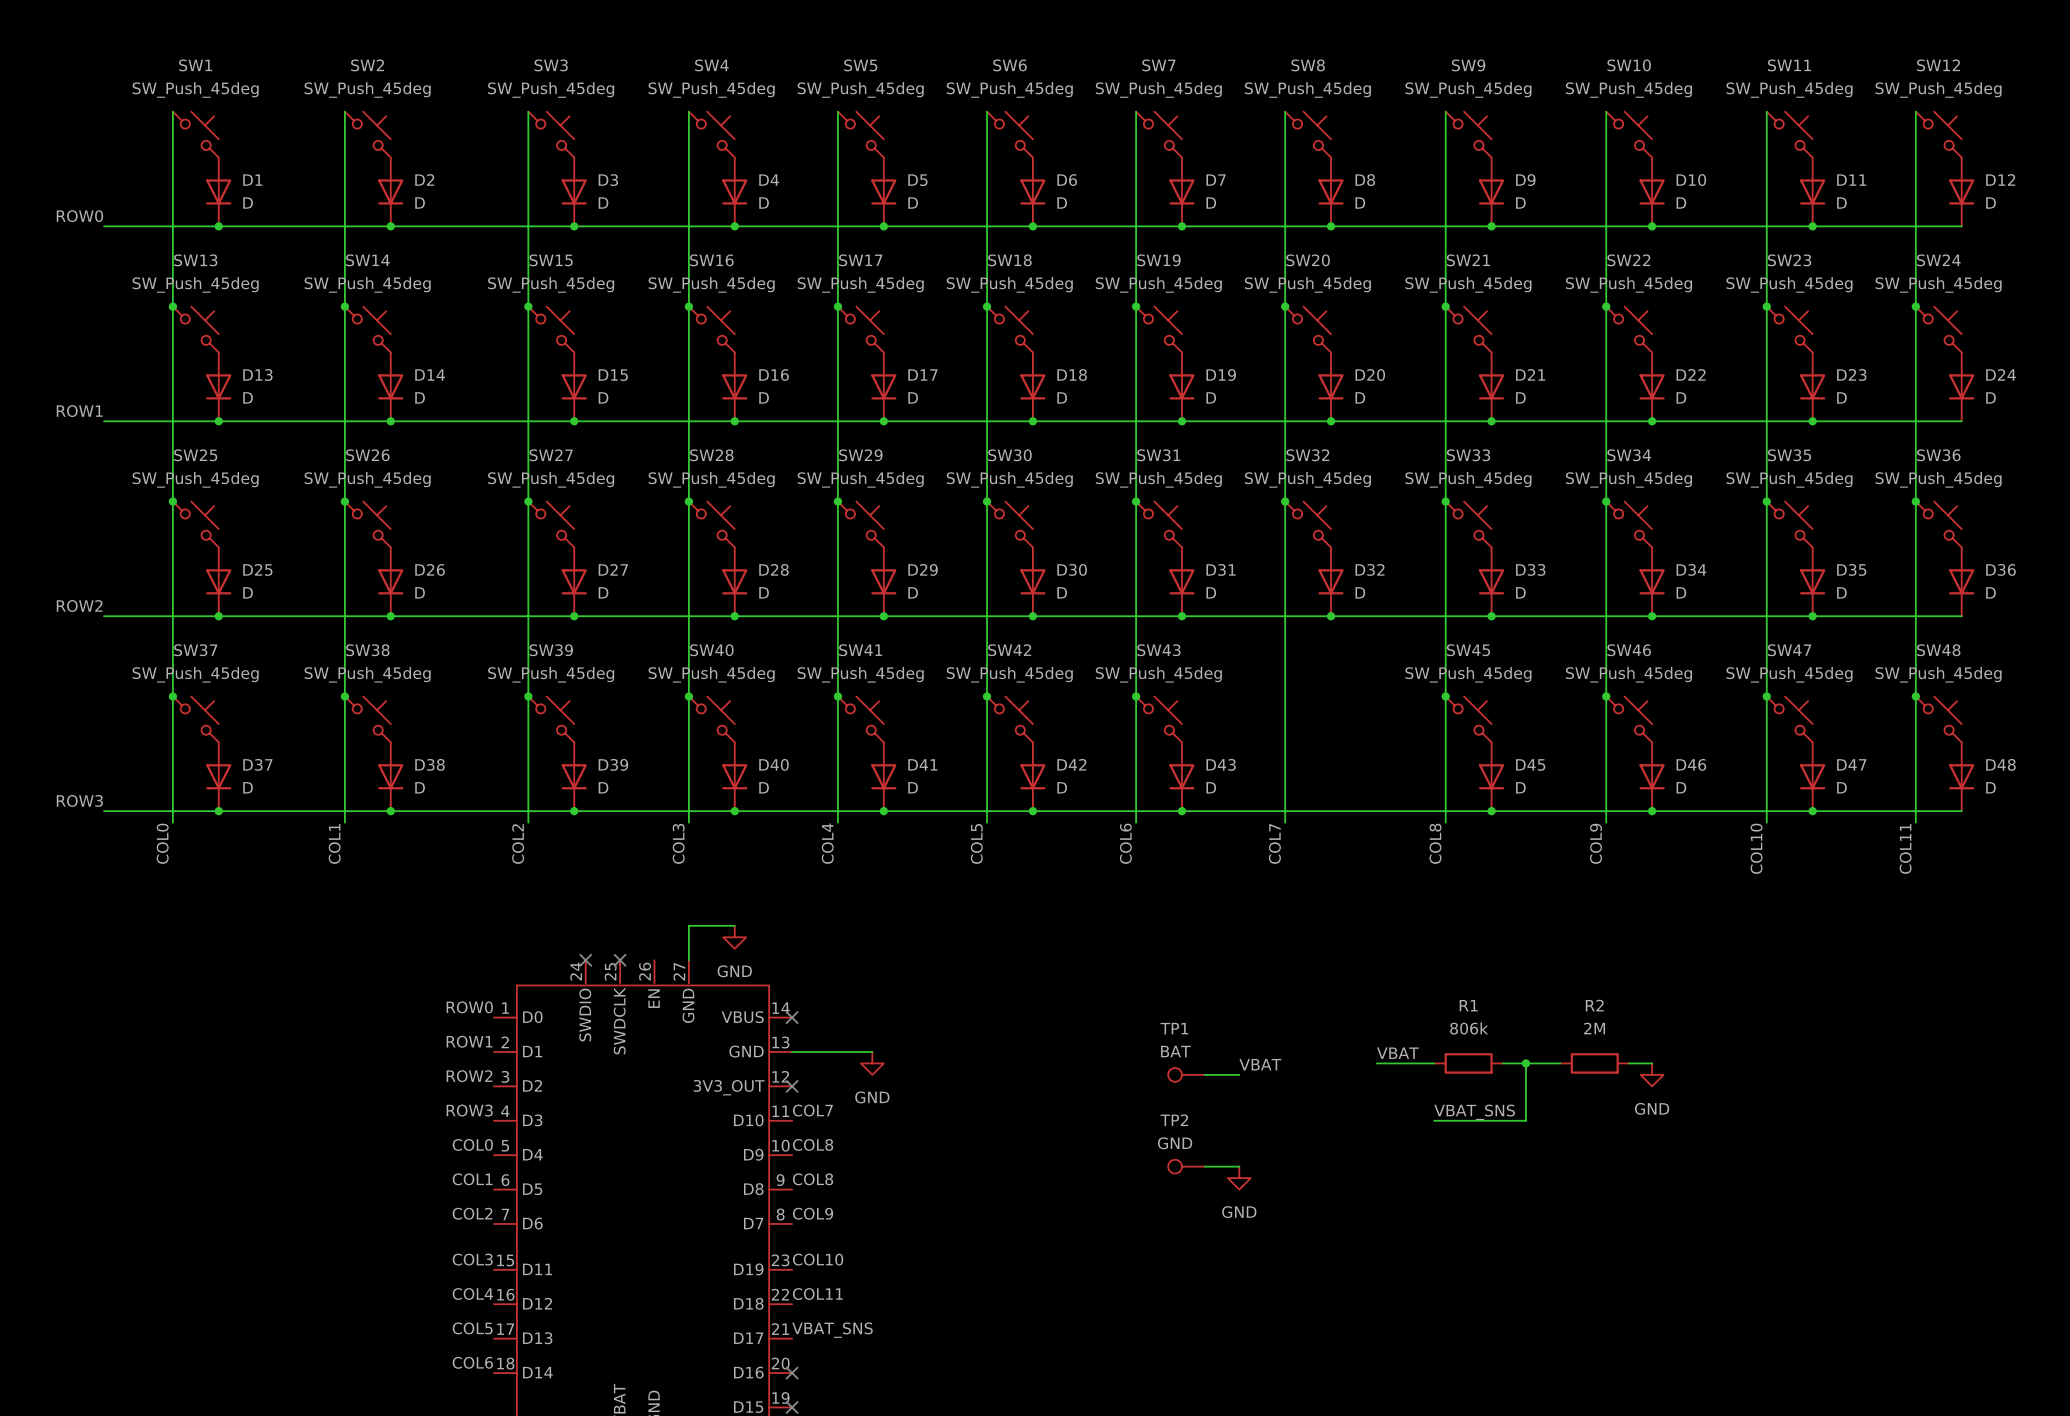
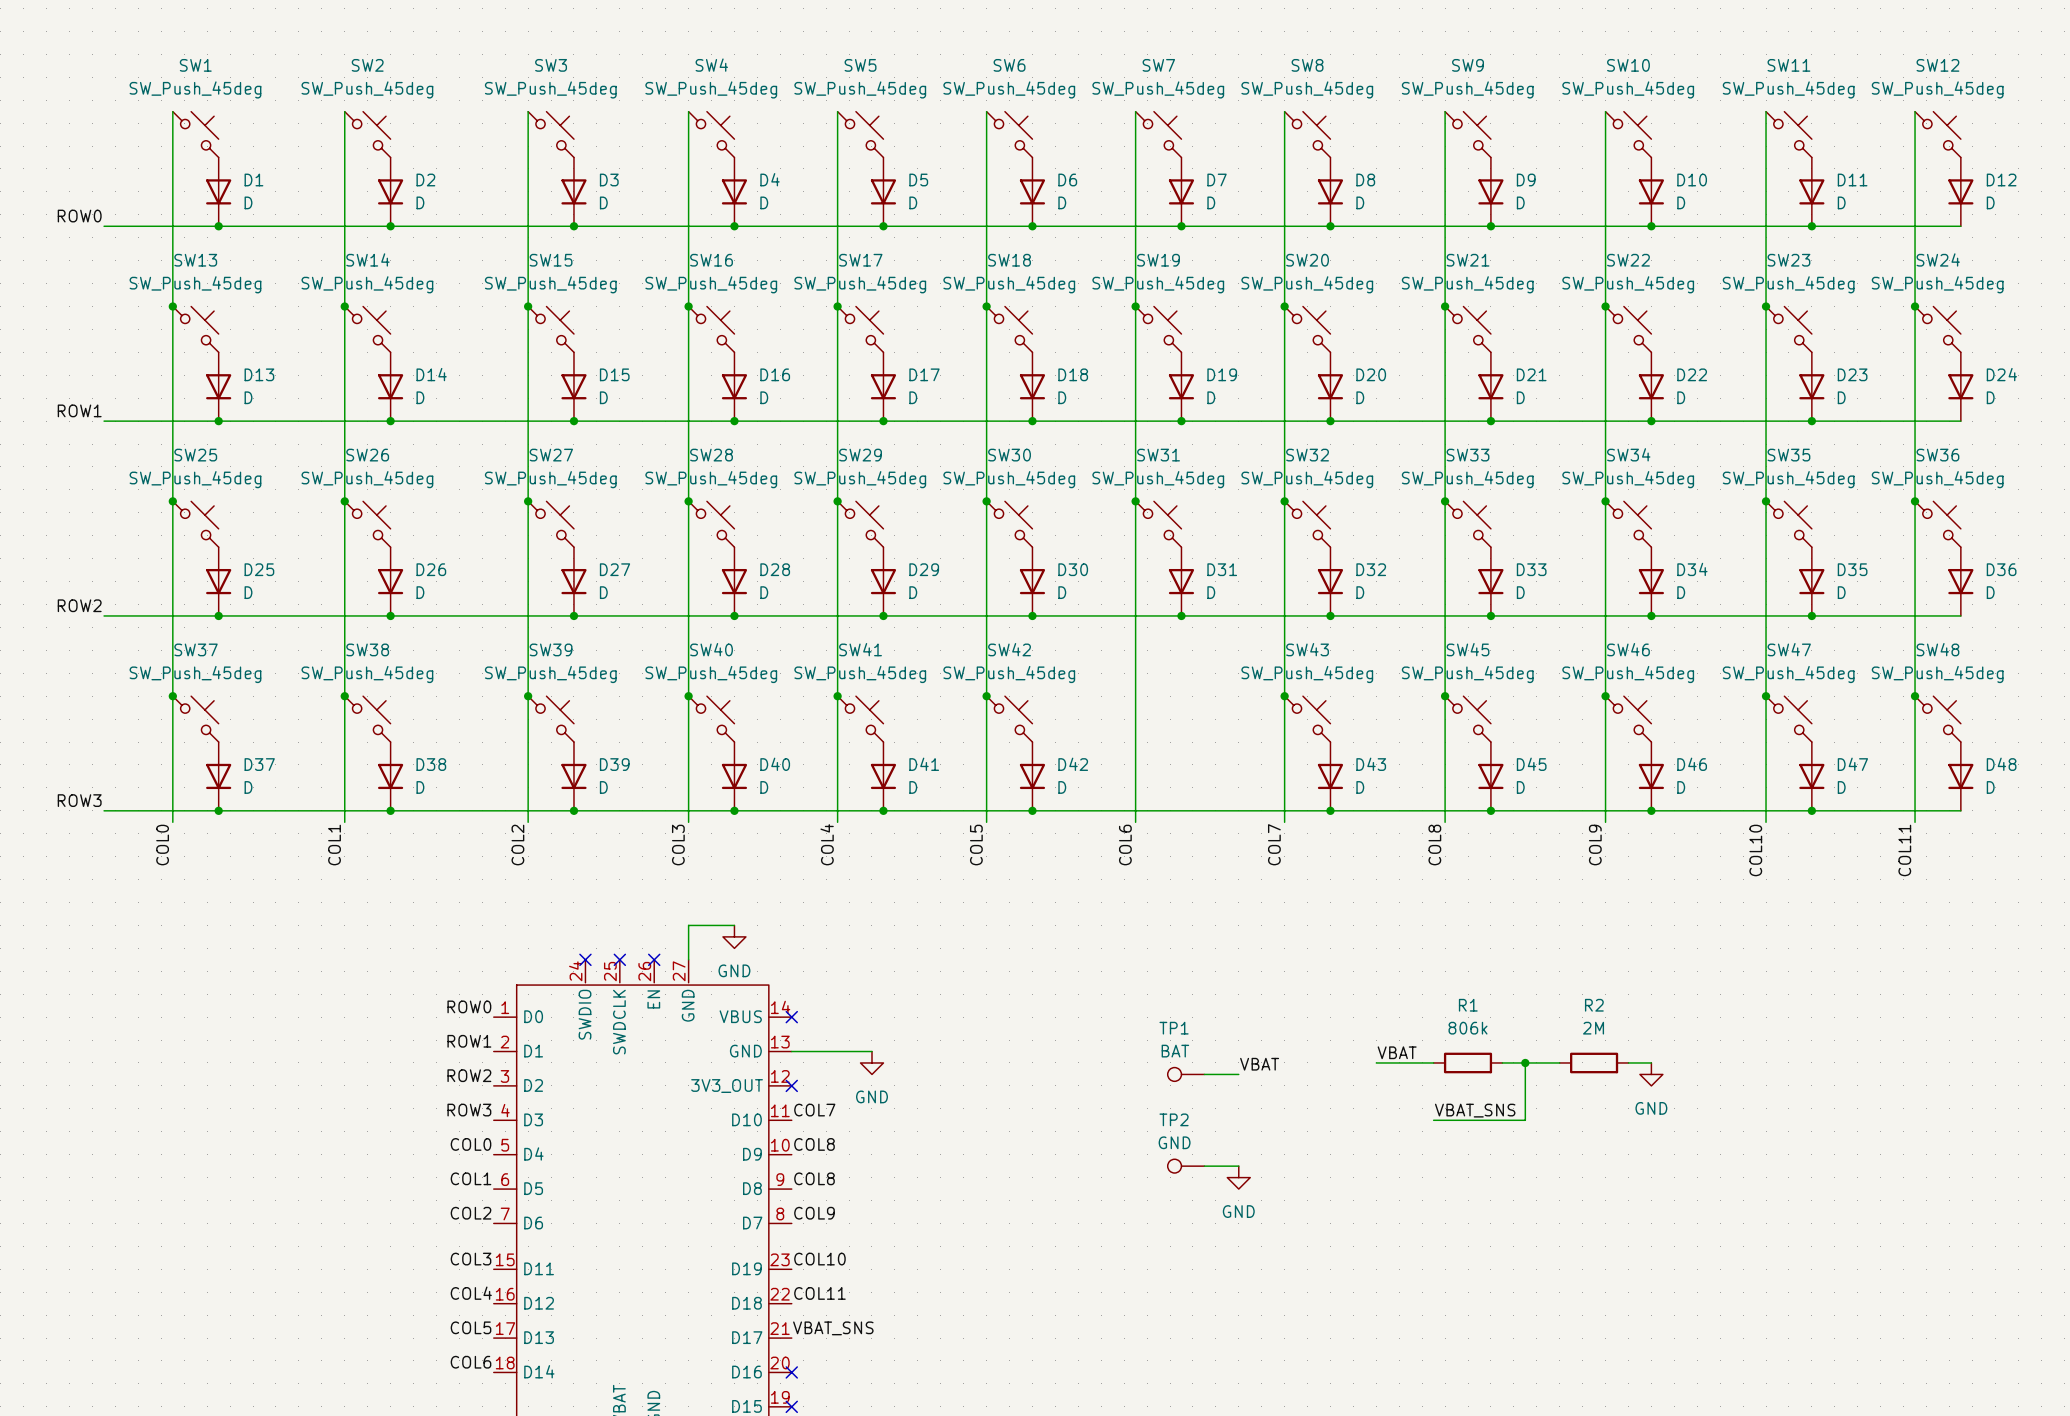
junction: (1136, 696) -> none
junction: none -> (1284, 696)
SW43 position: (1159, 719) -> (1307, 719)
D43 position: (1181, 776) -> (1330, 776)
junction: (1181, 811) -> none
junction: none -> (1330, 810)
no-connect mark: none -> (654, 959)

